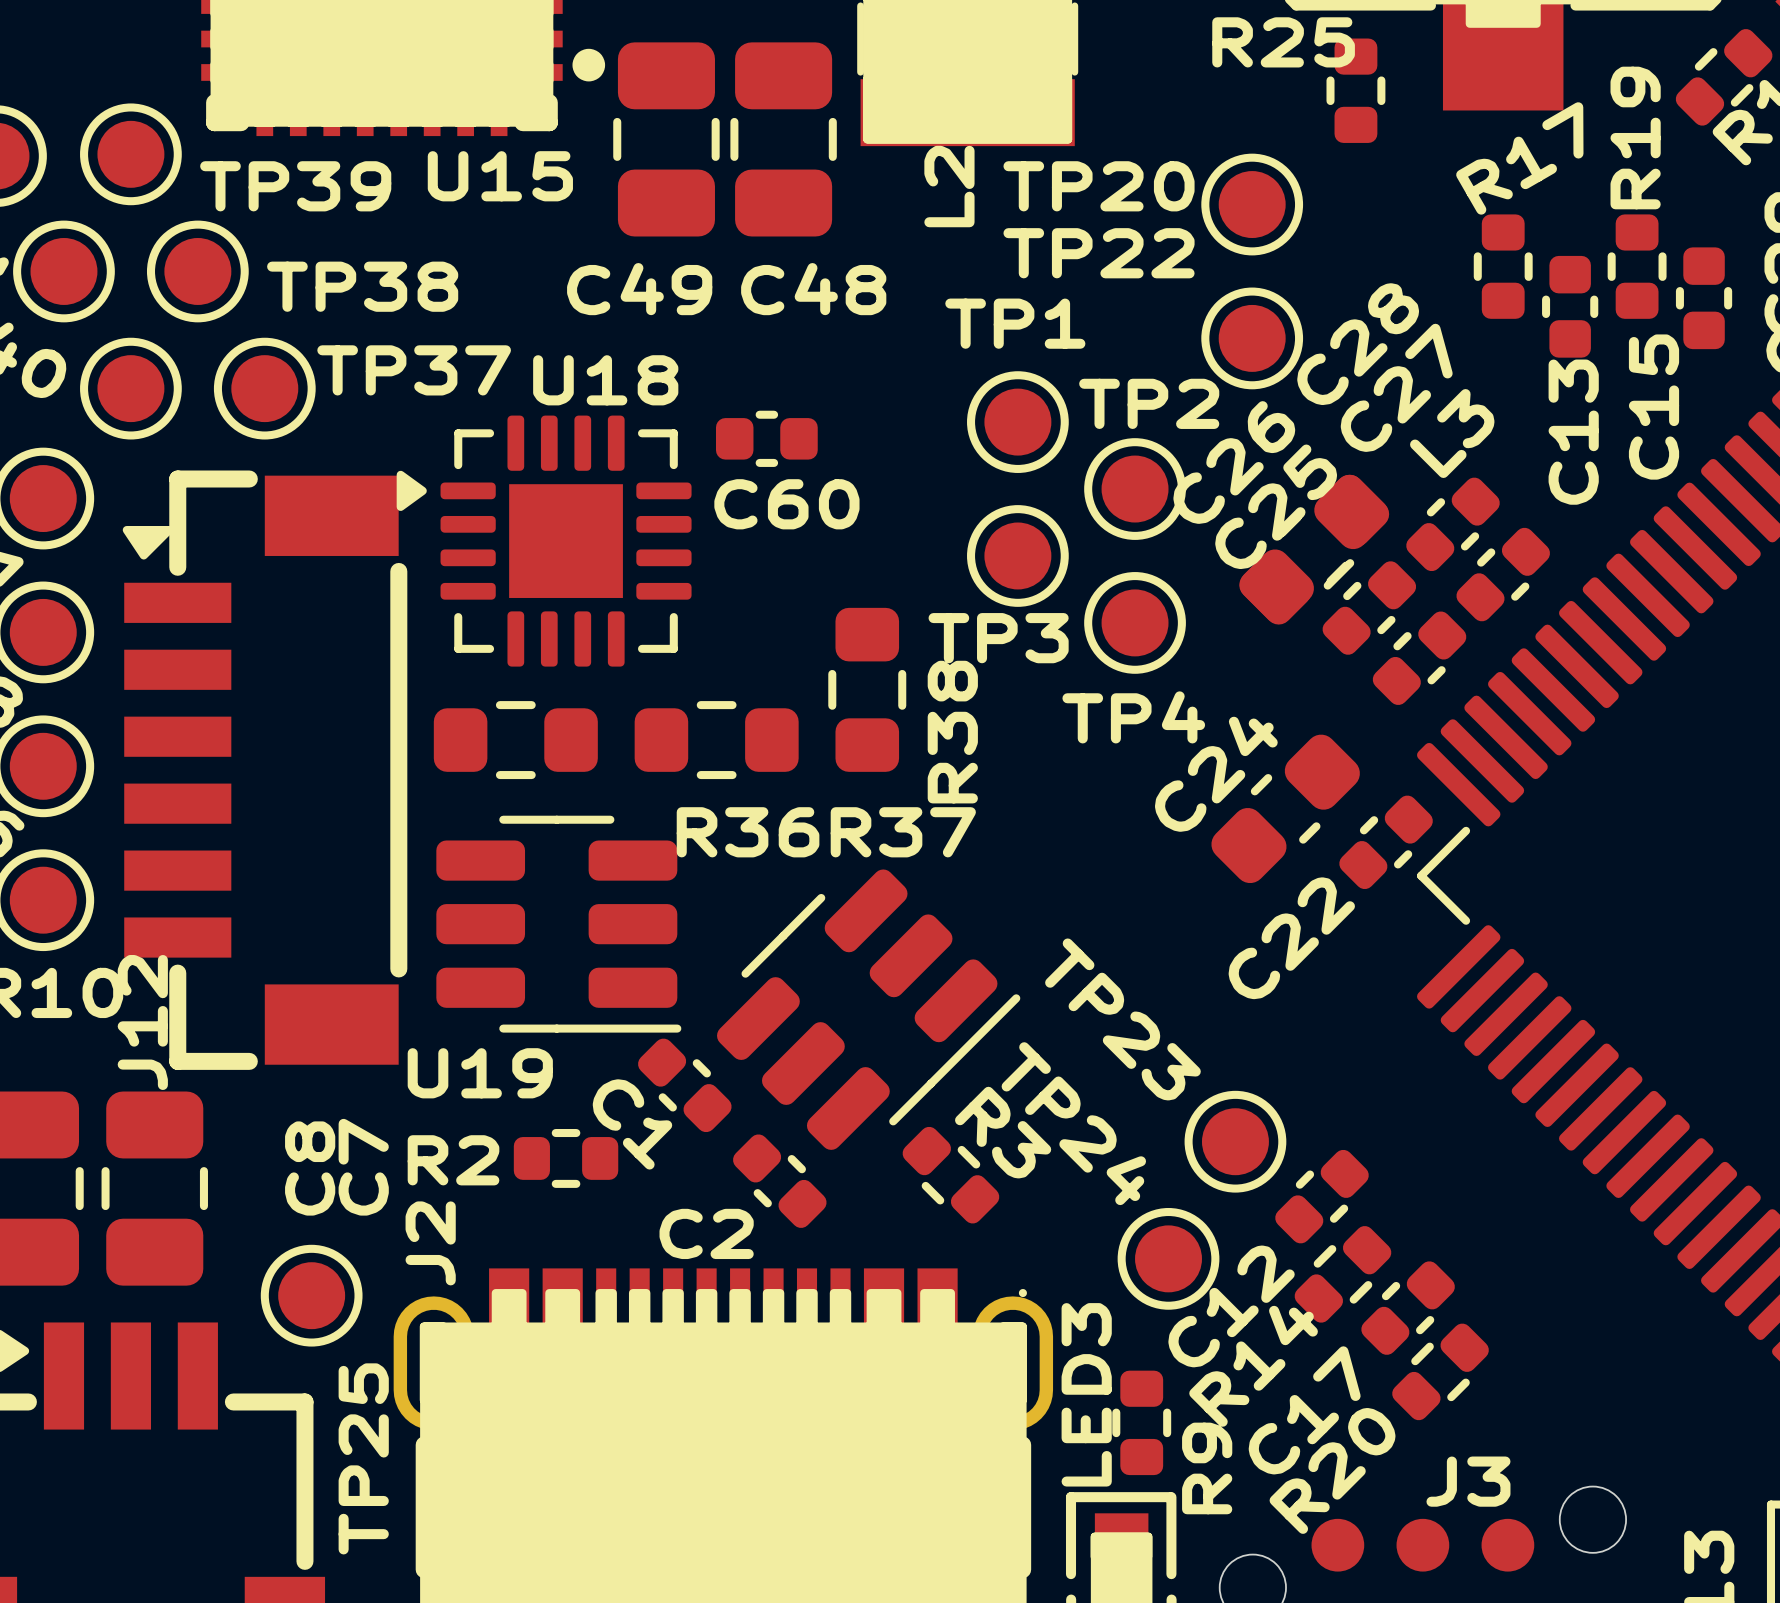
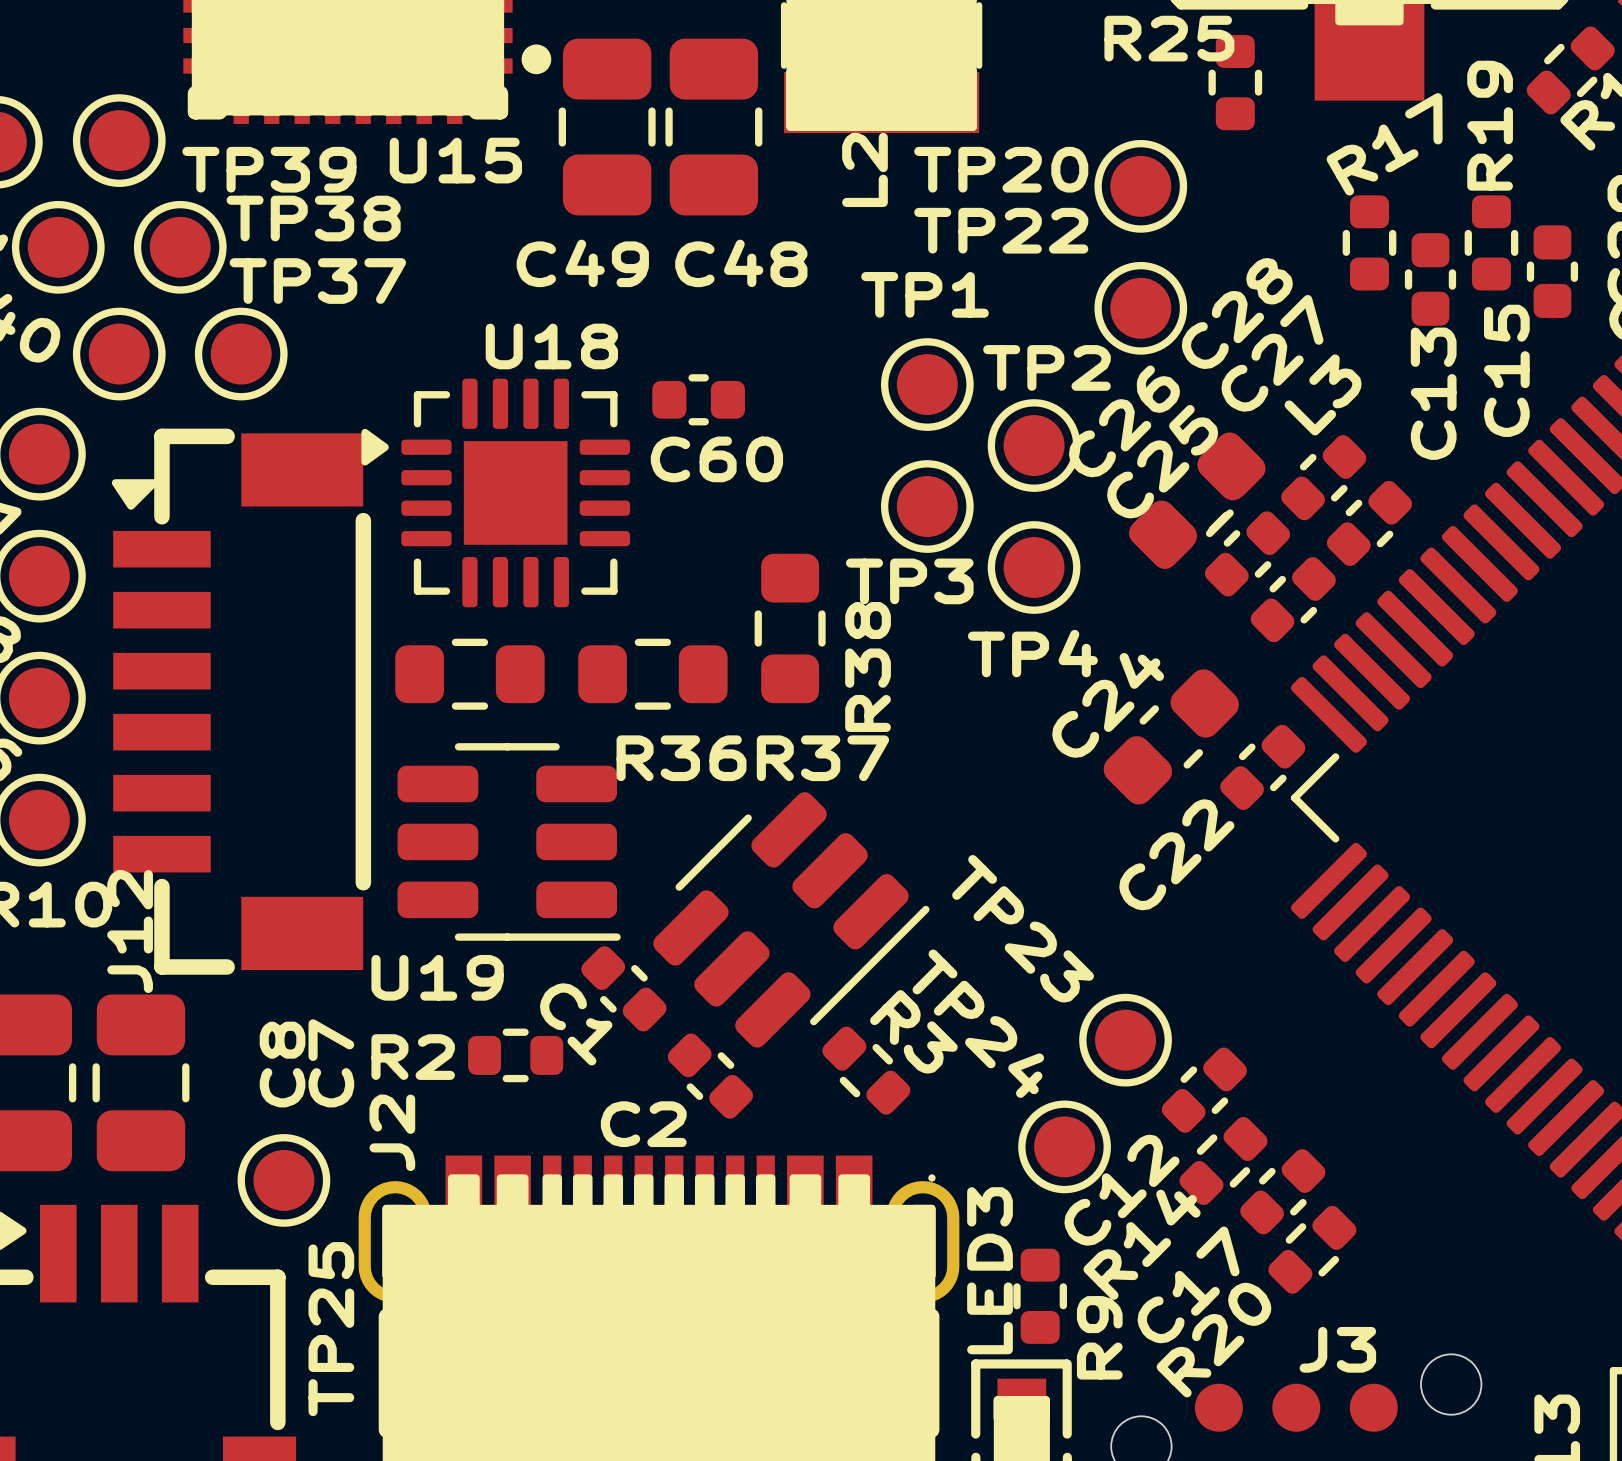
TP38 name position: TP38 (362, 286) -> TP38 (313, 218)
TP37 name position: TP37 (414, 370) -> TP37 (317, 281)

